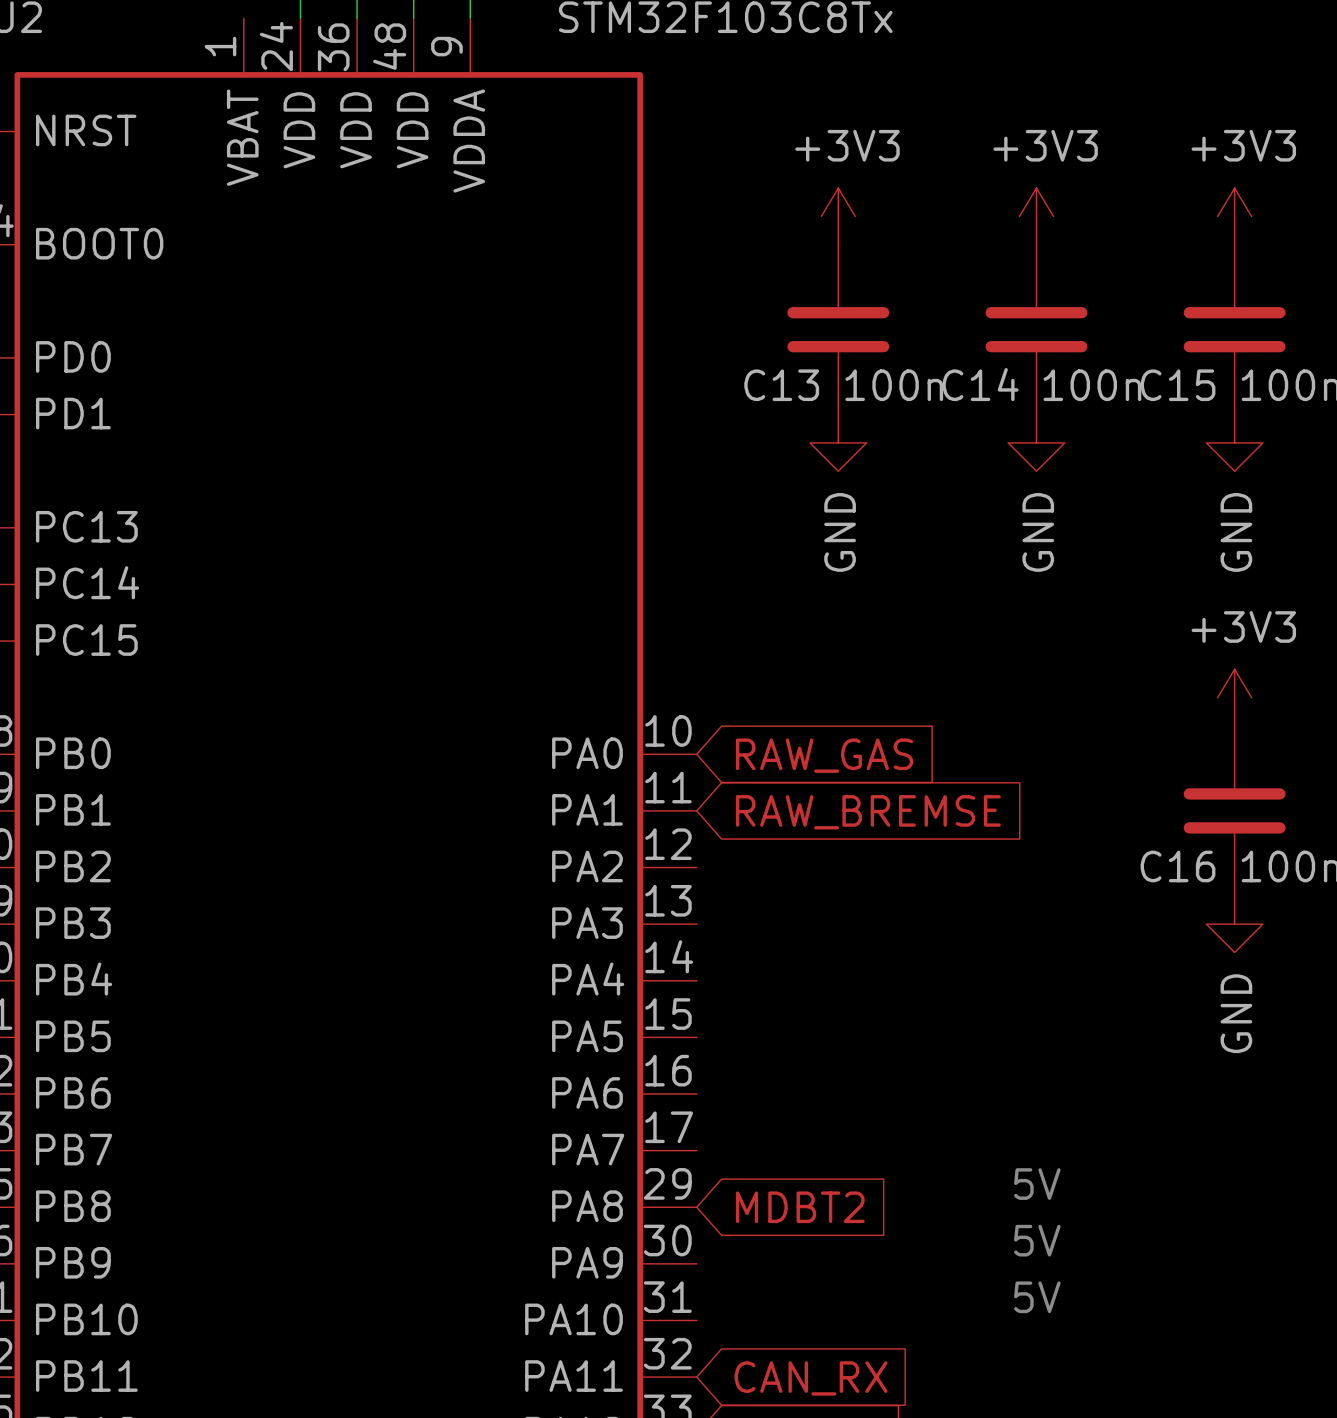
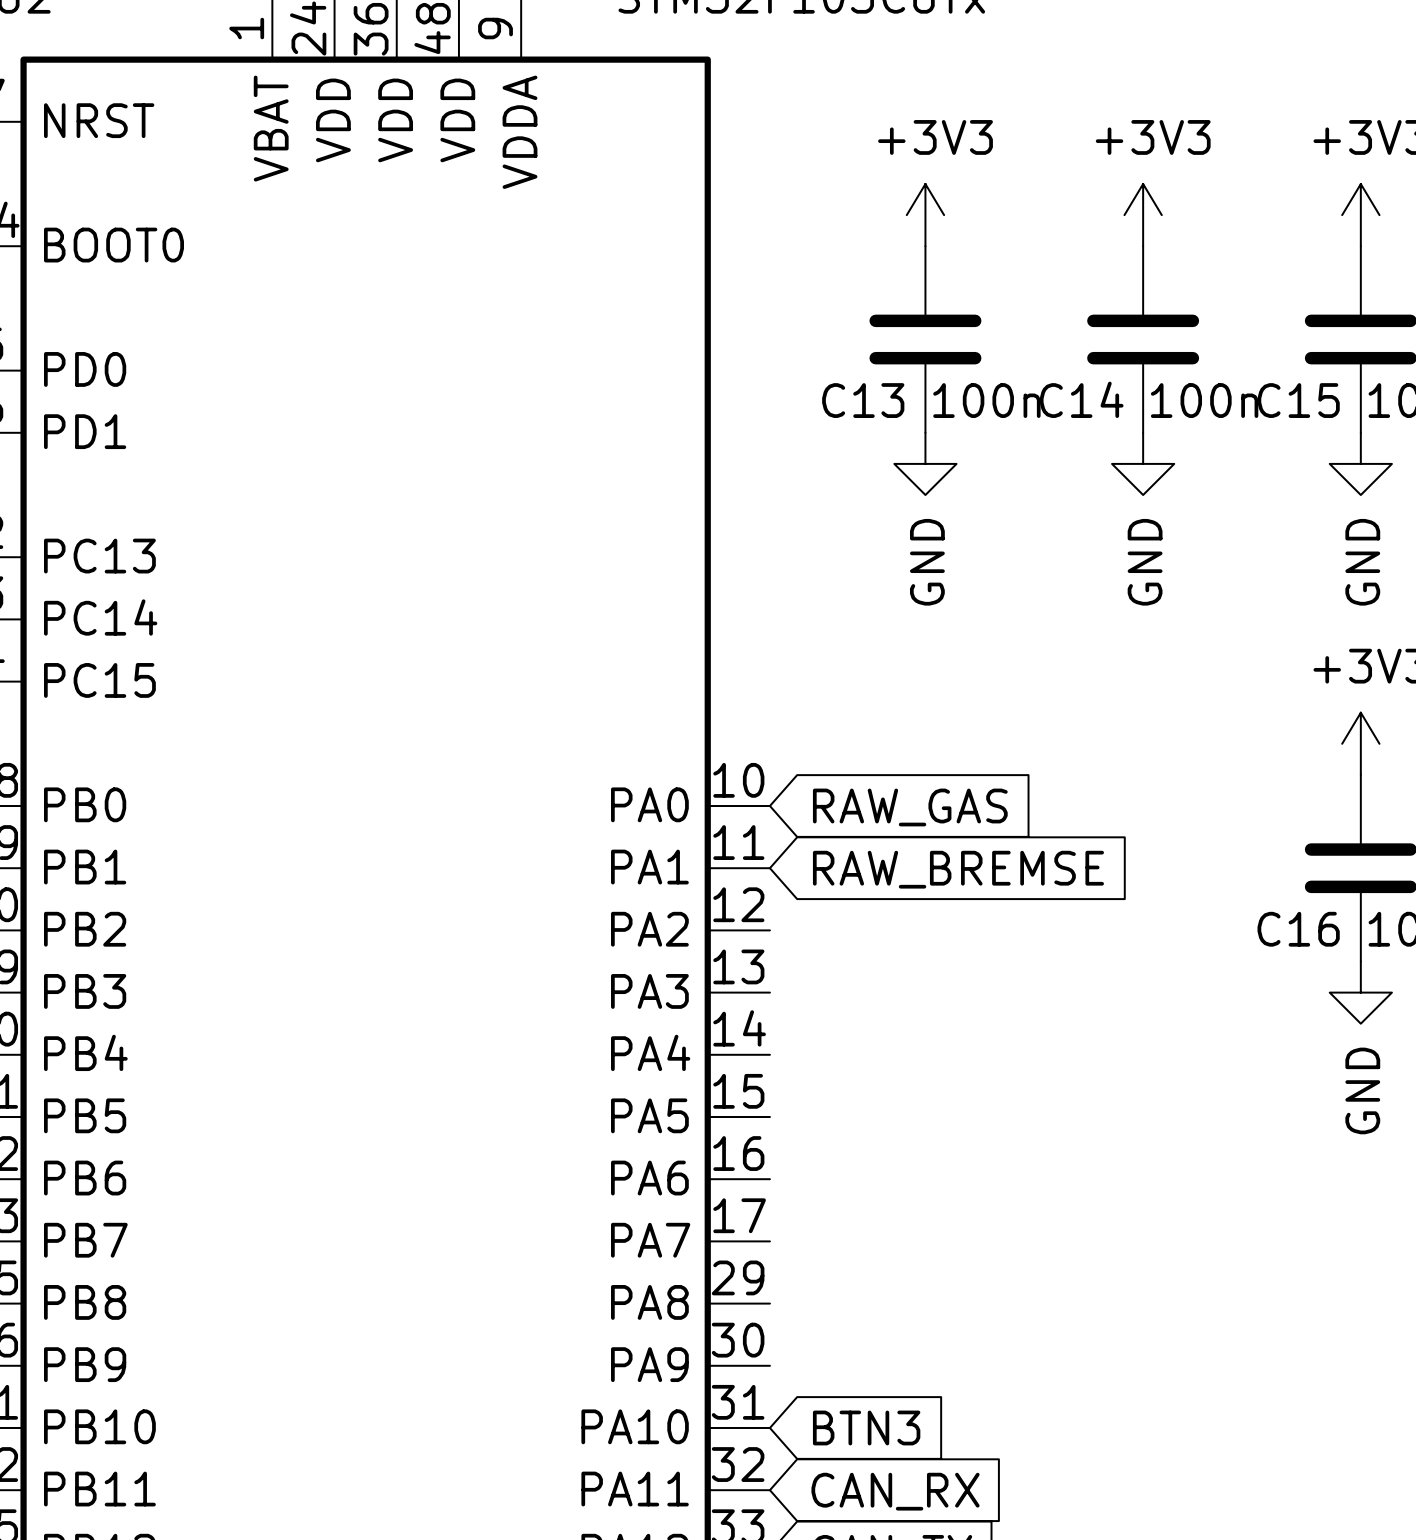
text: 5V (1037, 1184) -> none
global label: MDBT2 (800, 1207) -> none
text: 5V (1037, 1240) -> none
text: 5V (1037, 1297) -> none
global label: none -> BTN3 (866, 1427)

